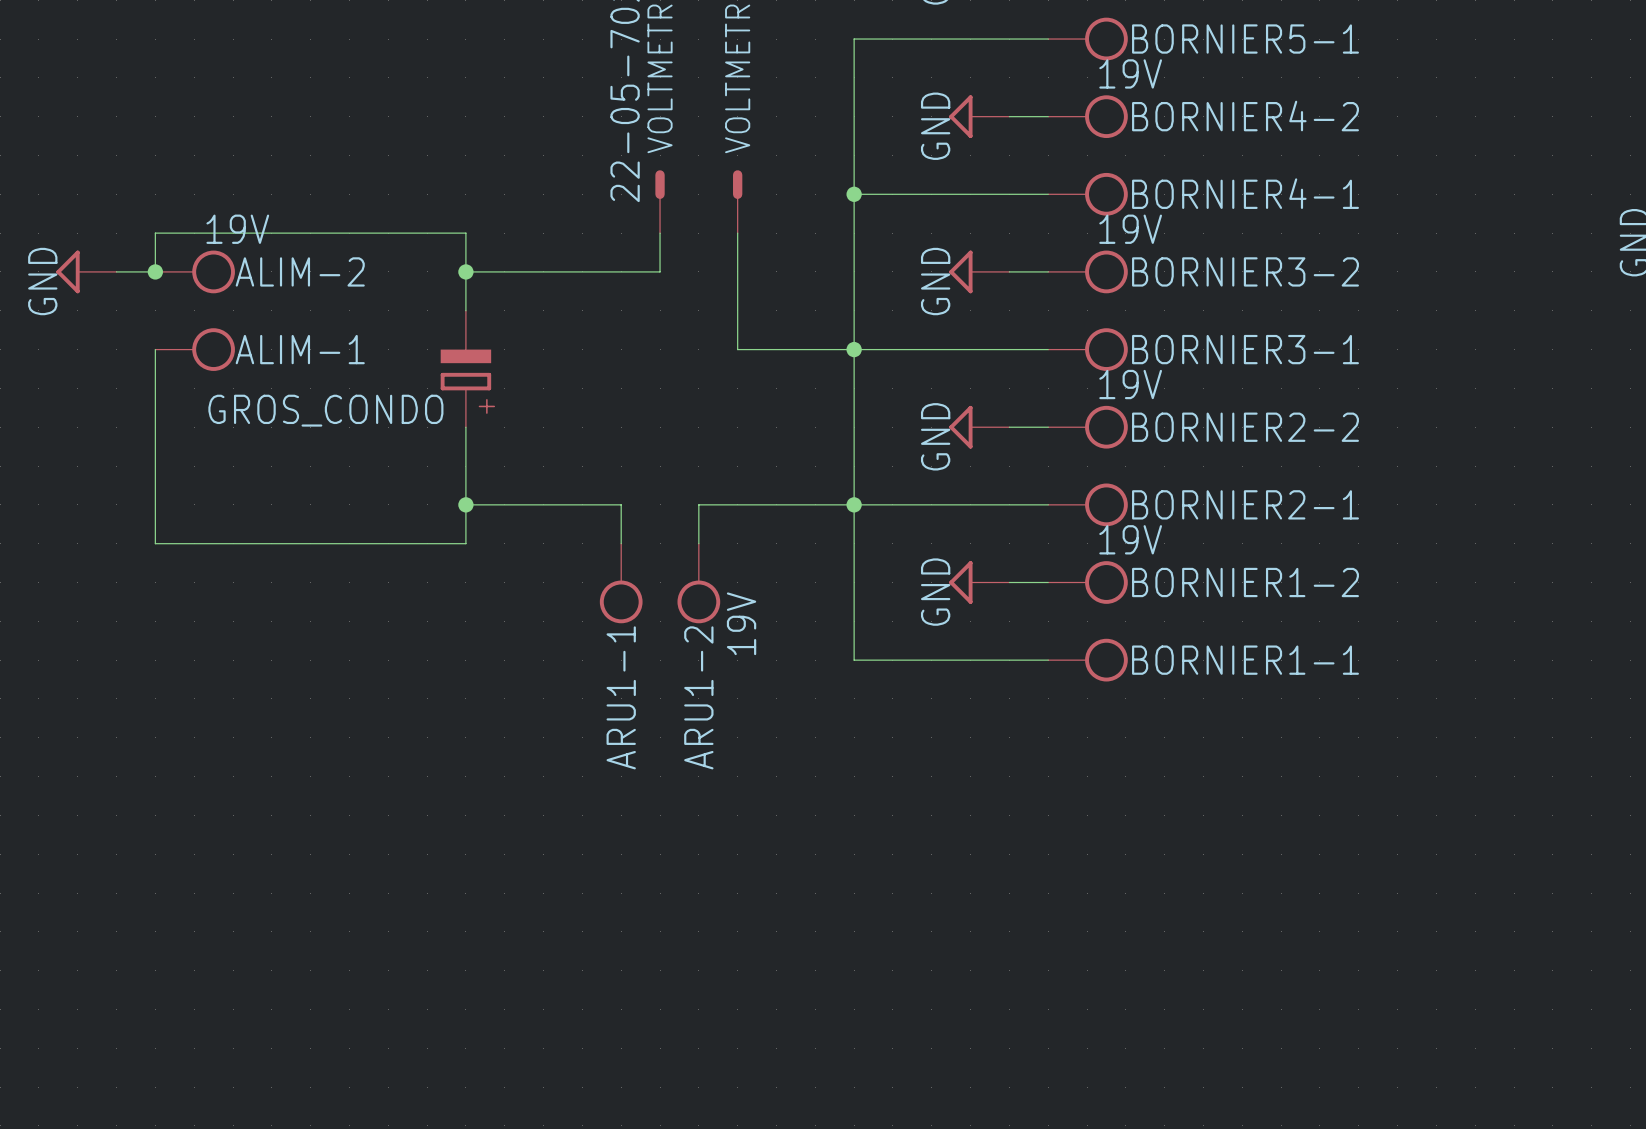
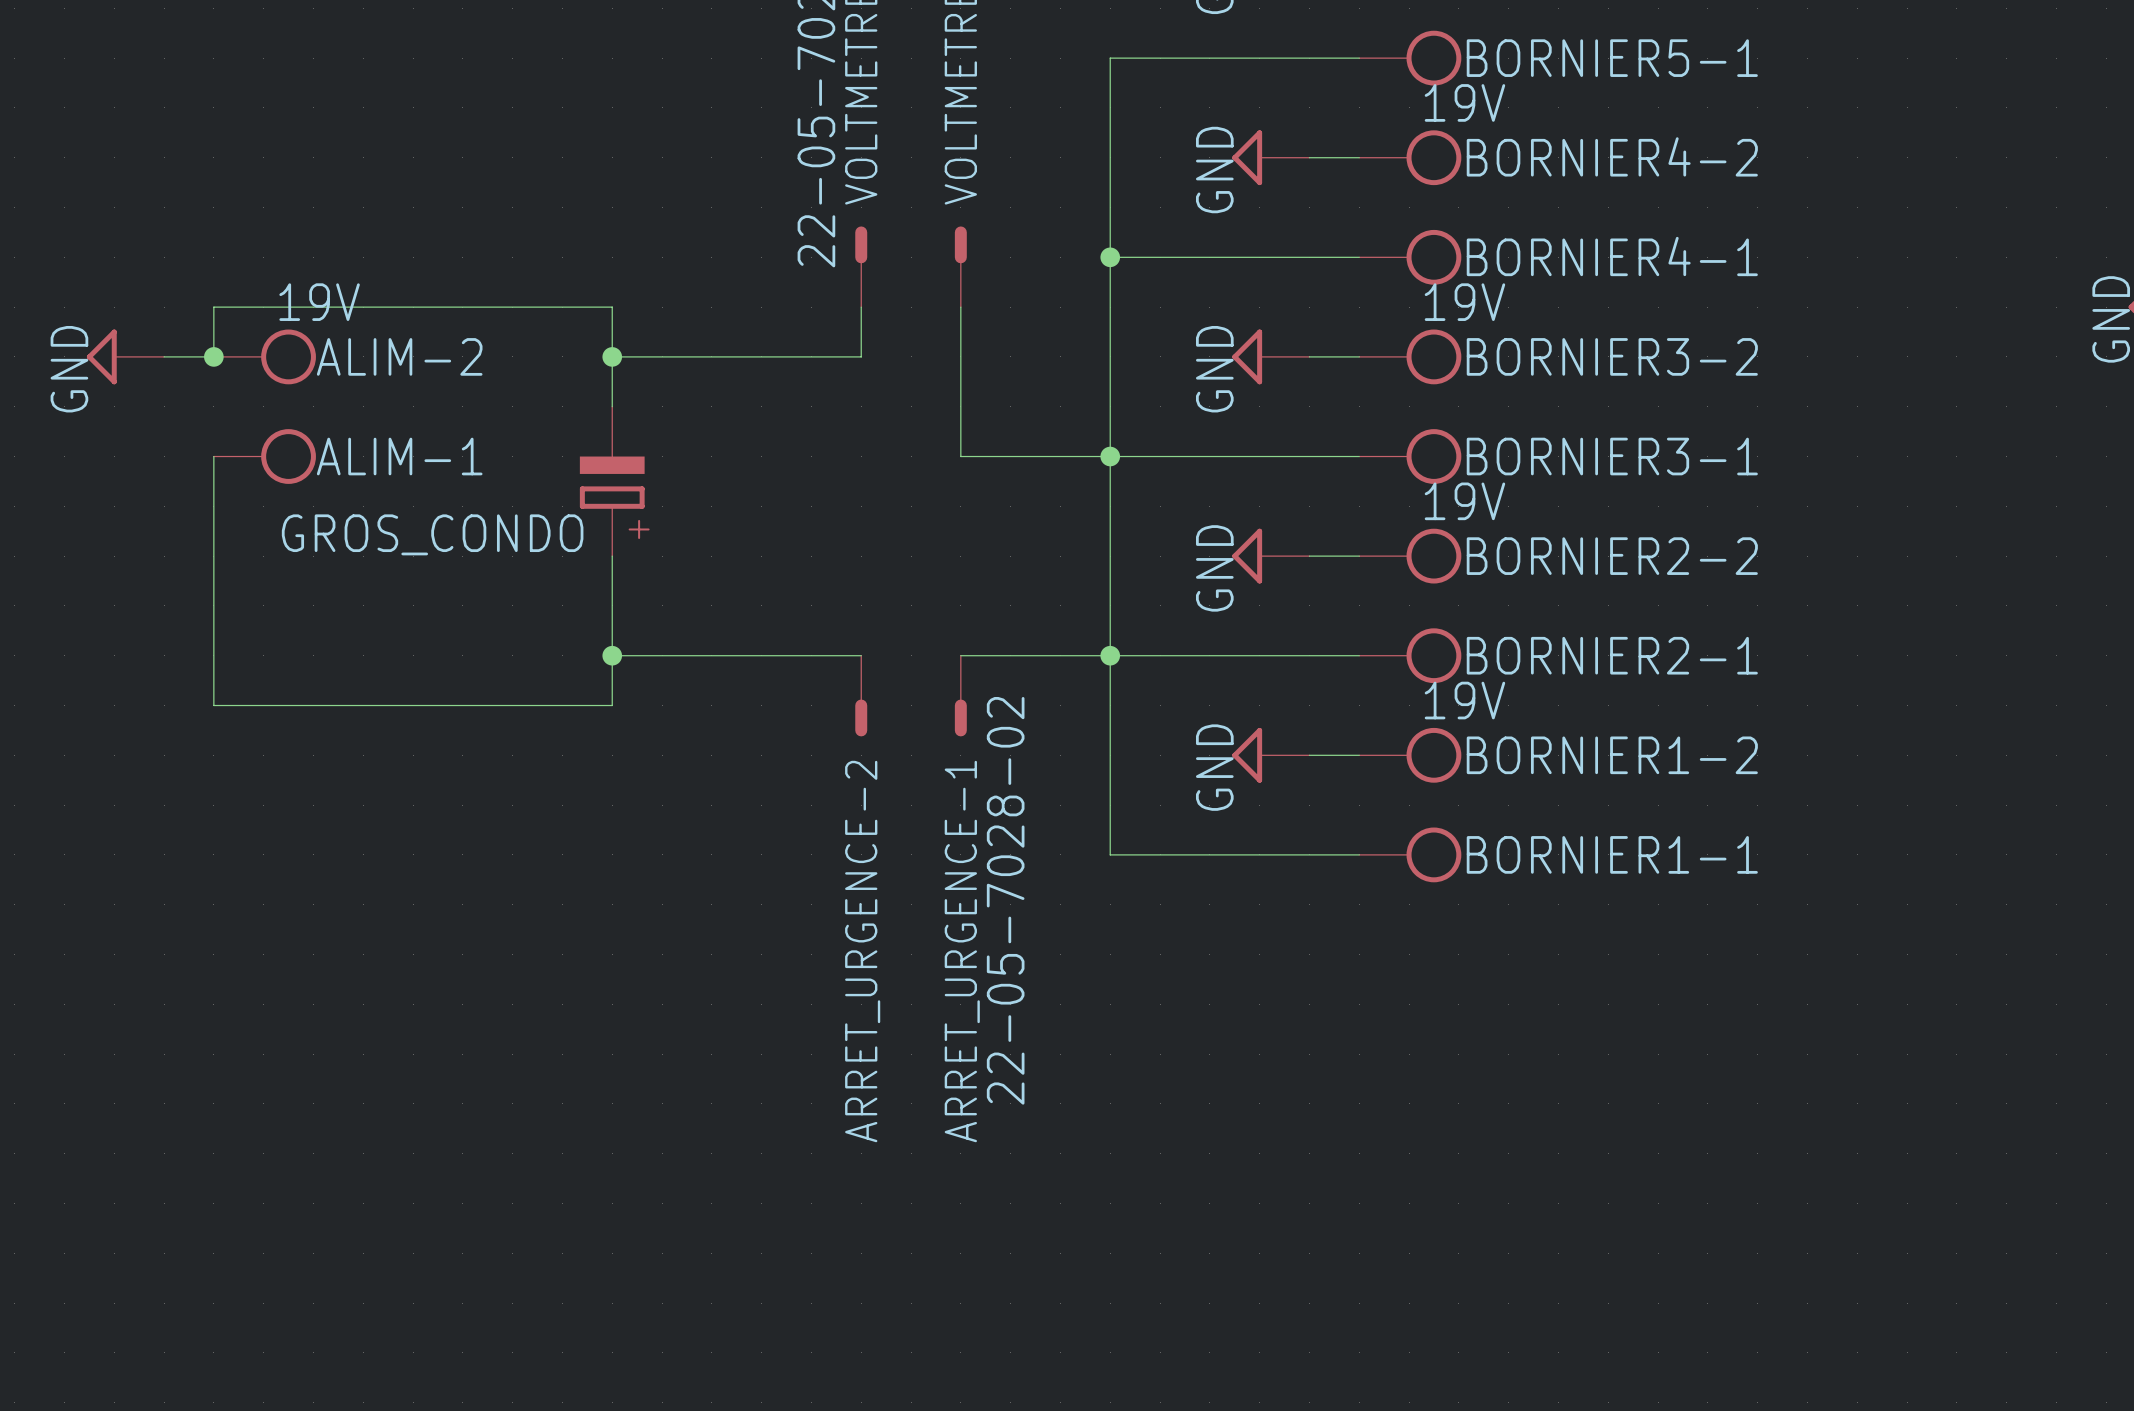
wire: (621, 504) (621, 543) -> (811, 655) (861, 655)
wire: (737, 504) (698, 504) (698, 543) -> none
ARRET_URGENCE-2: none -> (861, 696)
ARRET_URGENCE-1: none -> 22-05-7028-02 (960, 696)
ARU1-1: (621, 583) -> none
ARU1-2: 19V (698, 583) -> none

